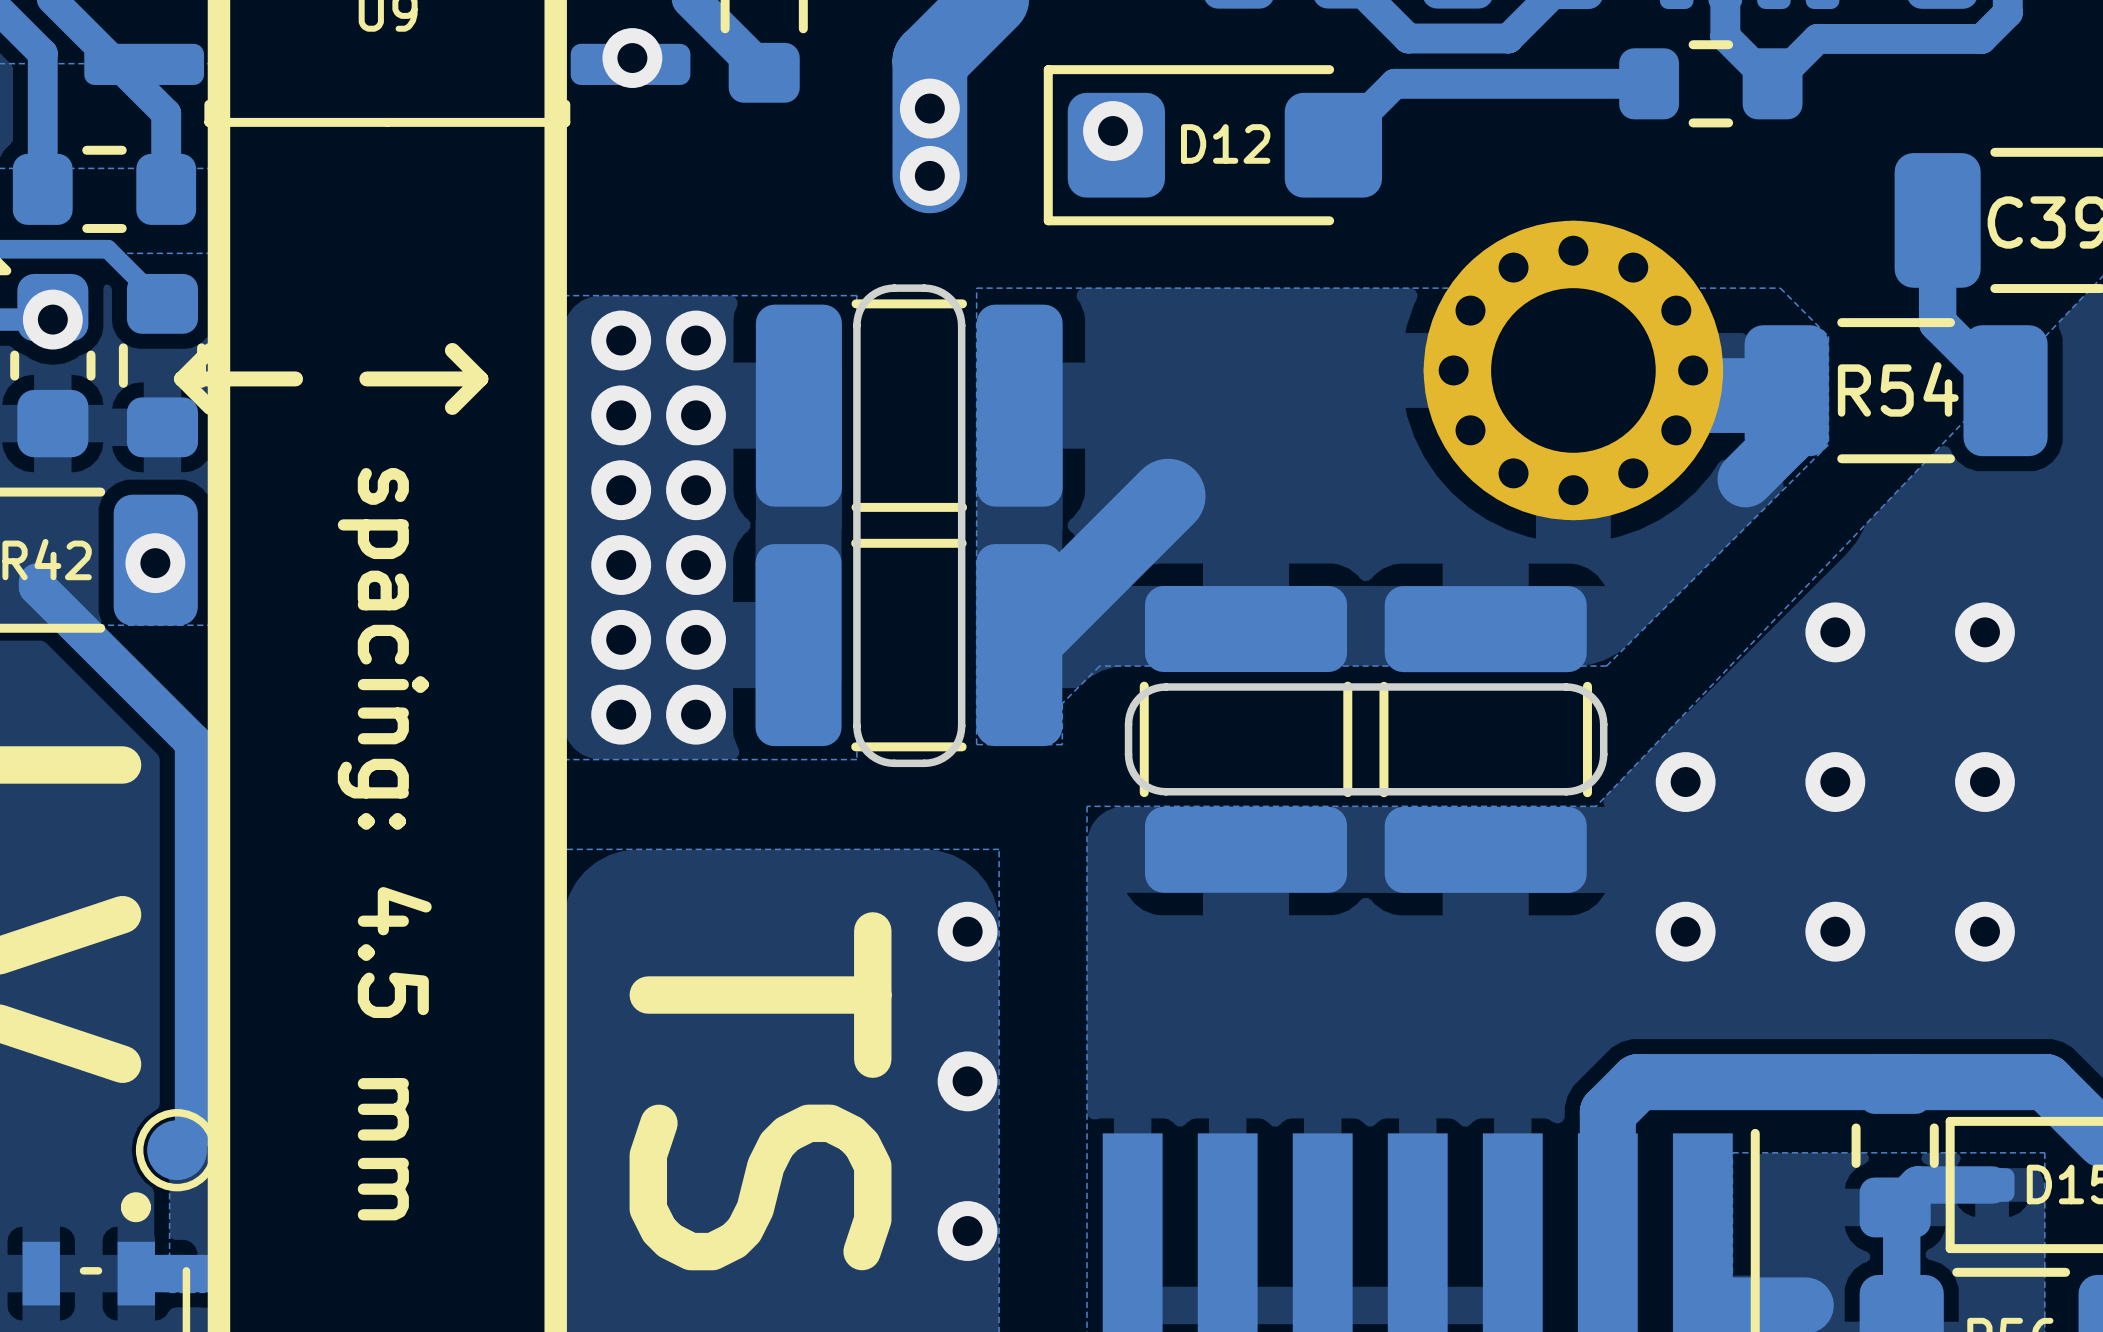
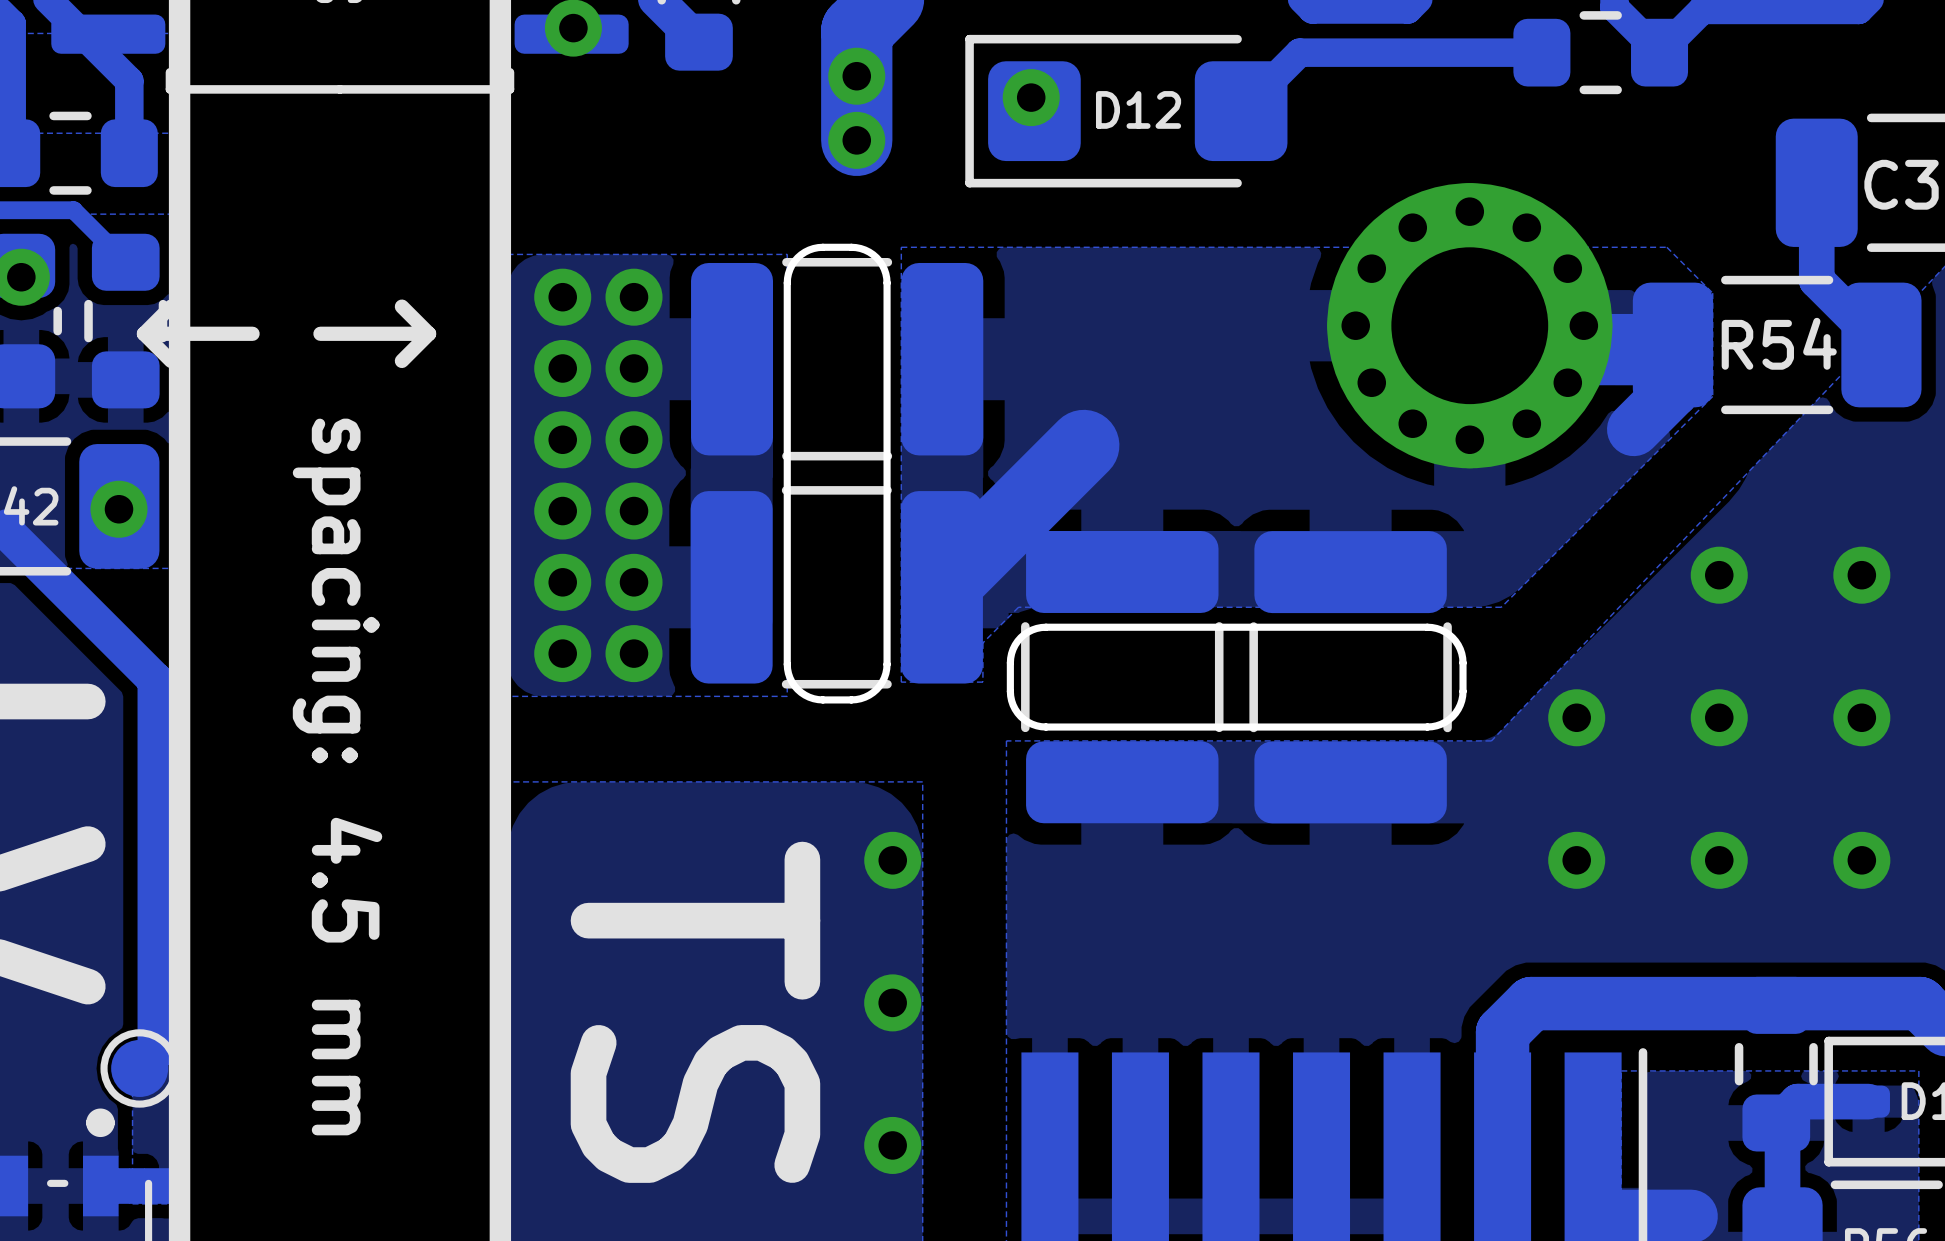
board edge: (1165, 686) (1151, 689) (1139, 697) (1131, 710) (1128, 724) (1128, 759) (1133, 773) (1147, 786) (1165, 791) -> (1081, 627) (1041, 627) (1028, 632) (1015, 645) (1010, 662) (1010, 696) (1013, 705) (1020, 716) (1028, 722) (1041, 726) (1081, 727)
board edge: (1528, 686) (1571, 687) (1585, 692) (1598, 705) (1603, 724) (1603, 759) (1600, 768) (1592, 780) (1585, 786) (1571, 791) (1528, 791) -> (1427, 627) (1441, 629) (1452, 637) (1460, 649) (1463, 662) (1462, 696) (1458, 709) (1445, 722) (1427, 727)
part position: (1246, 739) -> (1122, 677)
part position: (1485, 739) -> (1350, 677)

